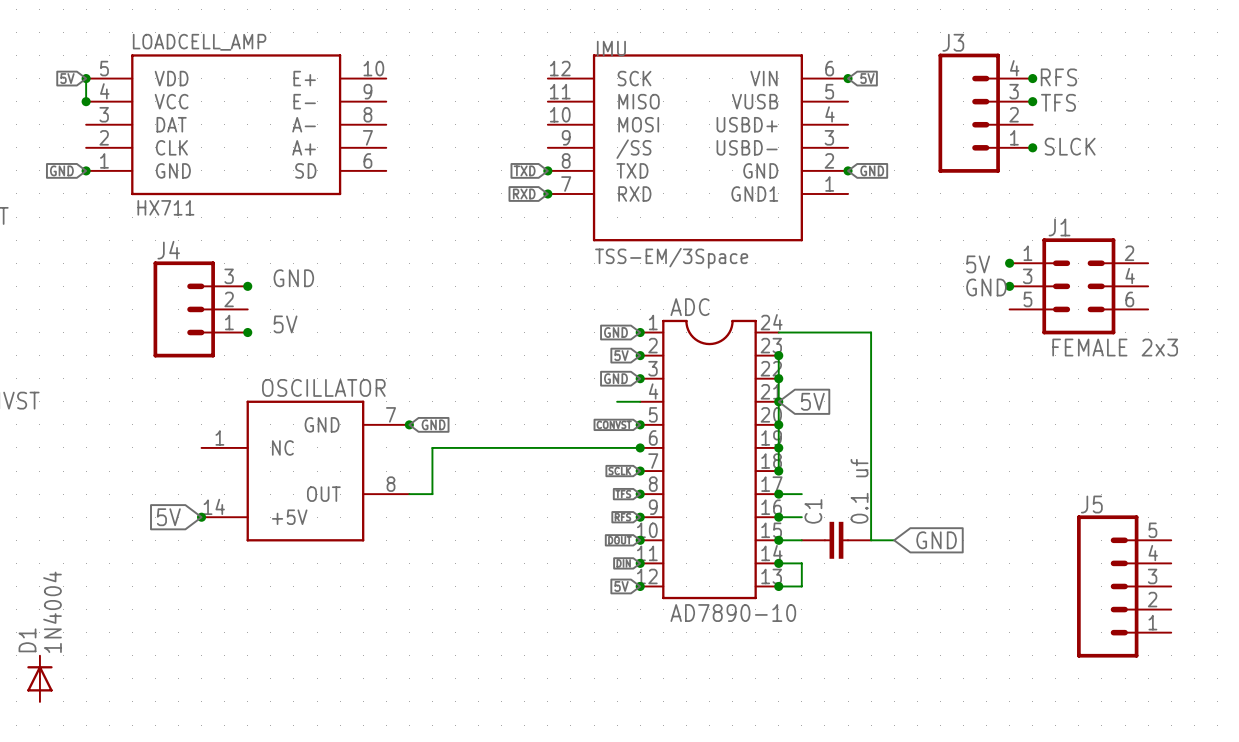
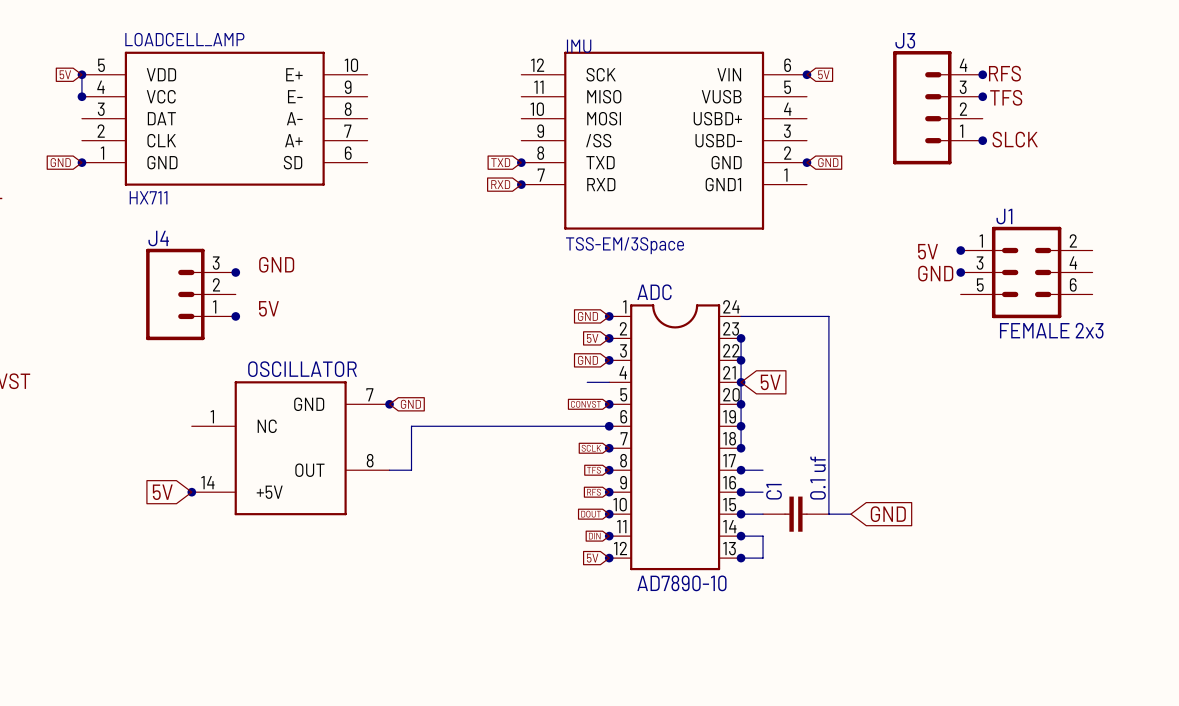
J5: (1124, 586) -> none
D1: 1N4004 (39, 678) -> none

